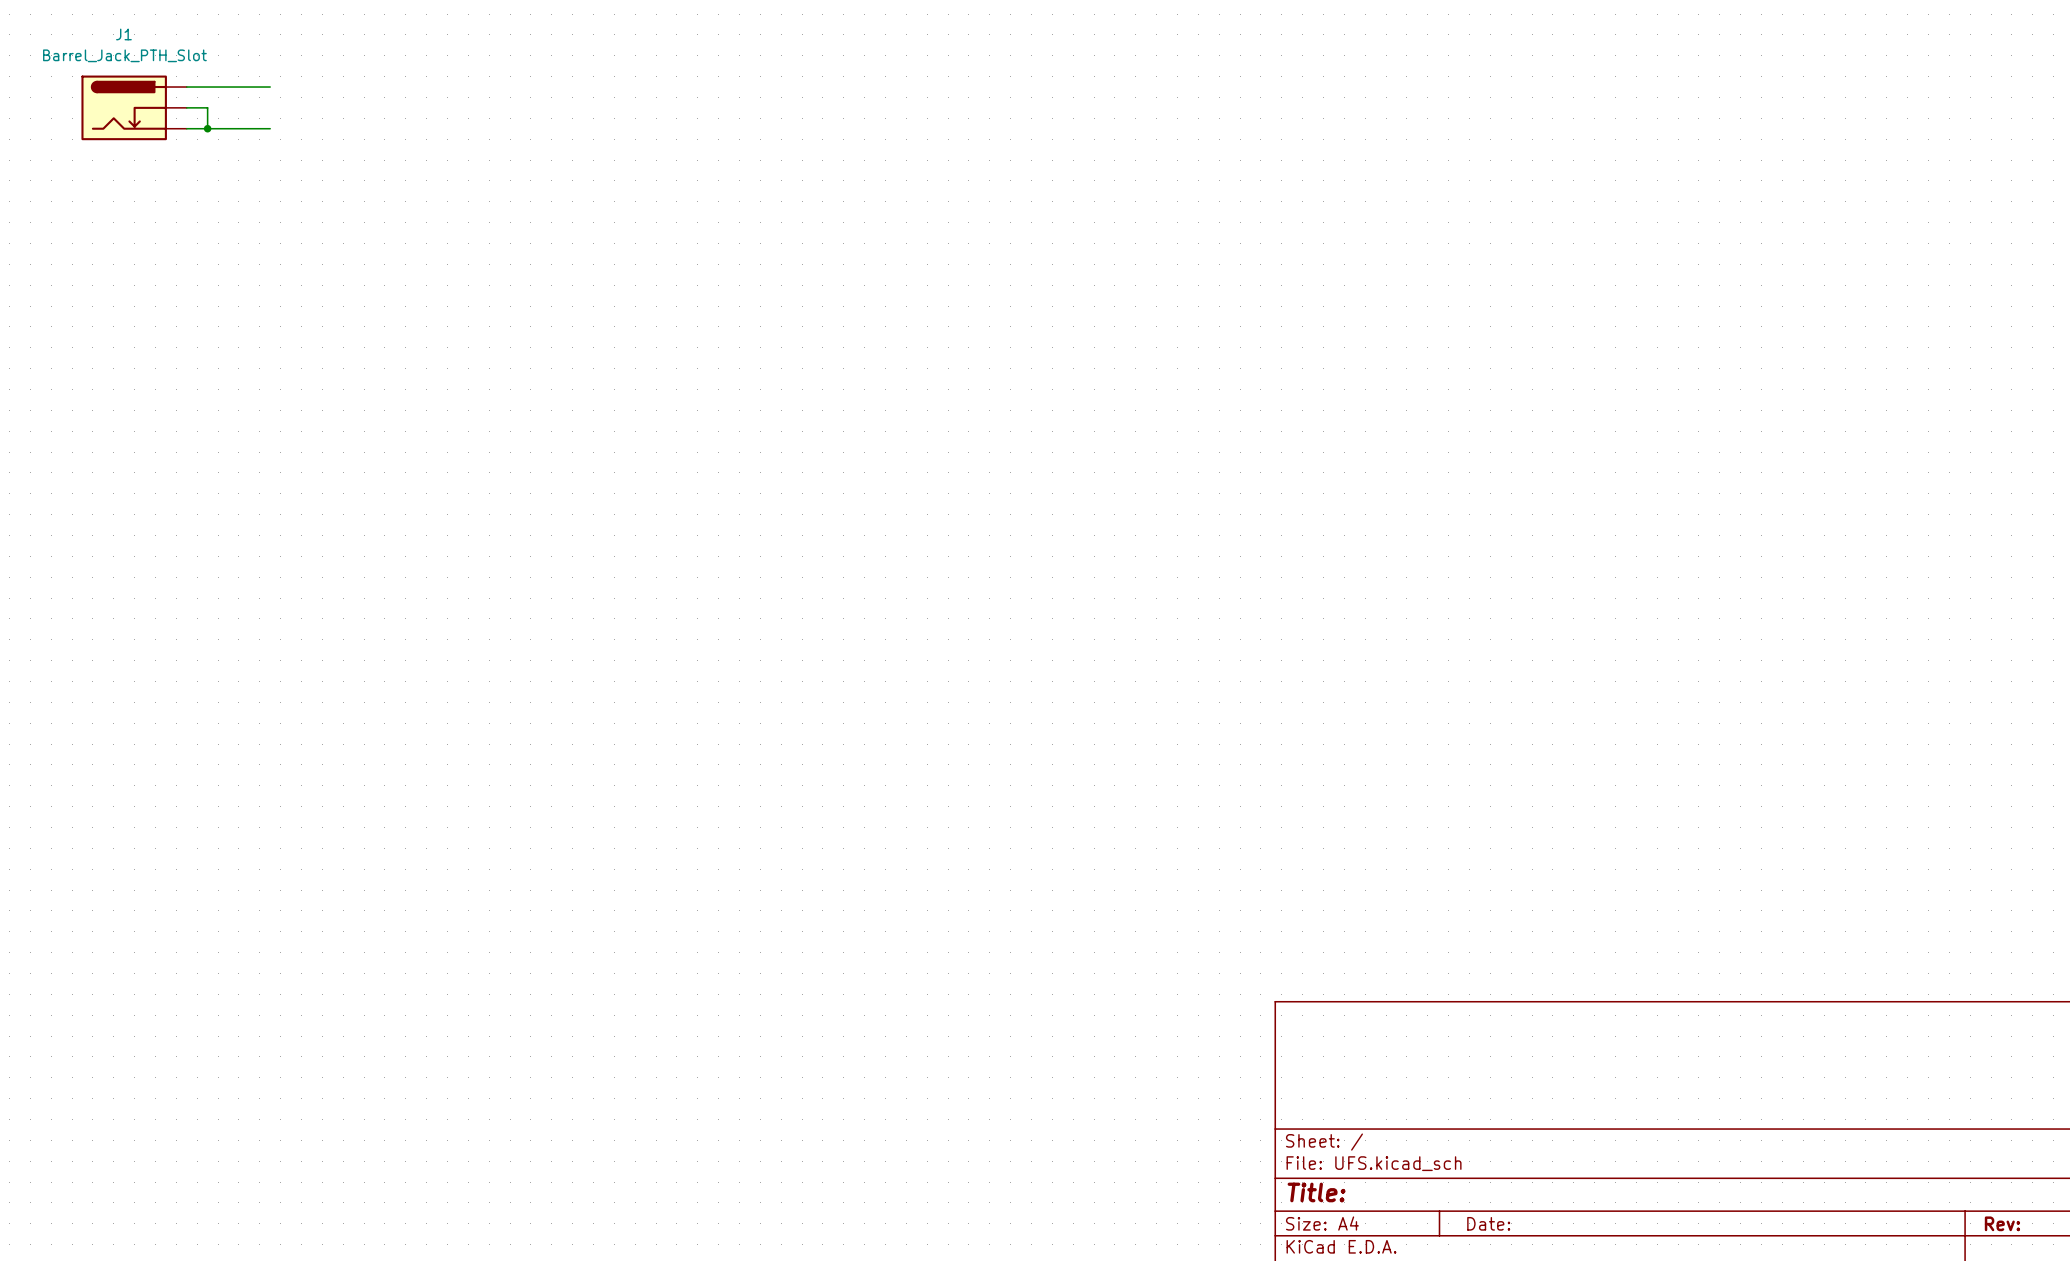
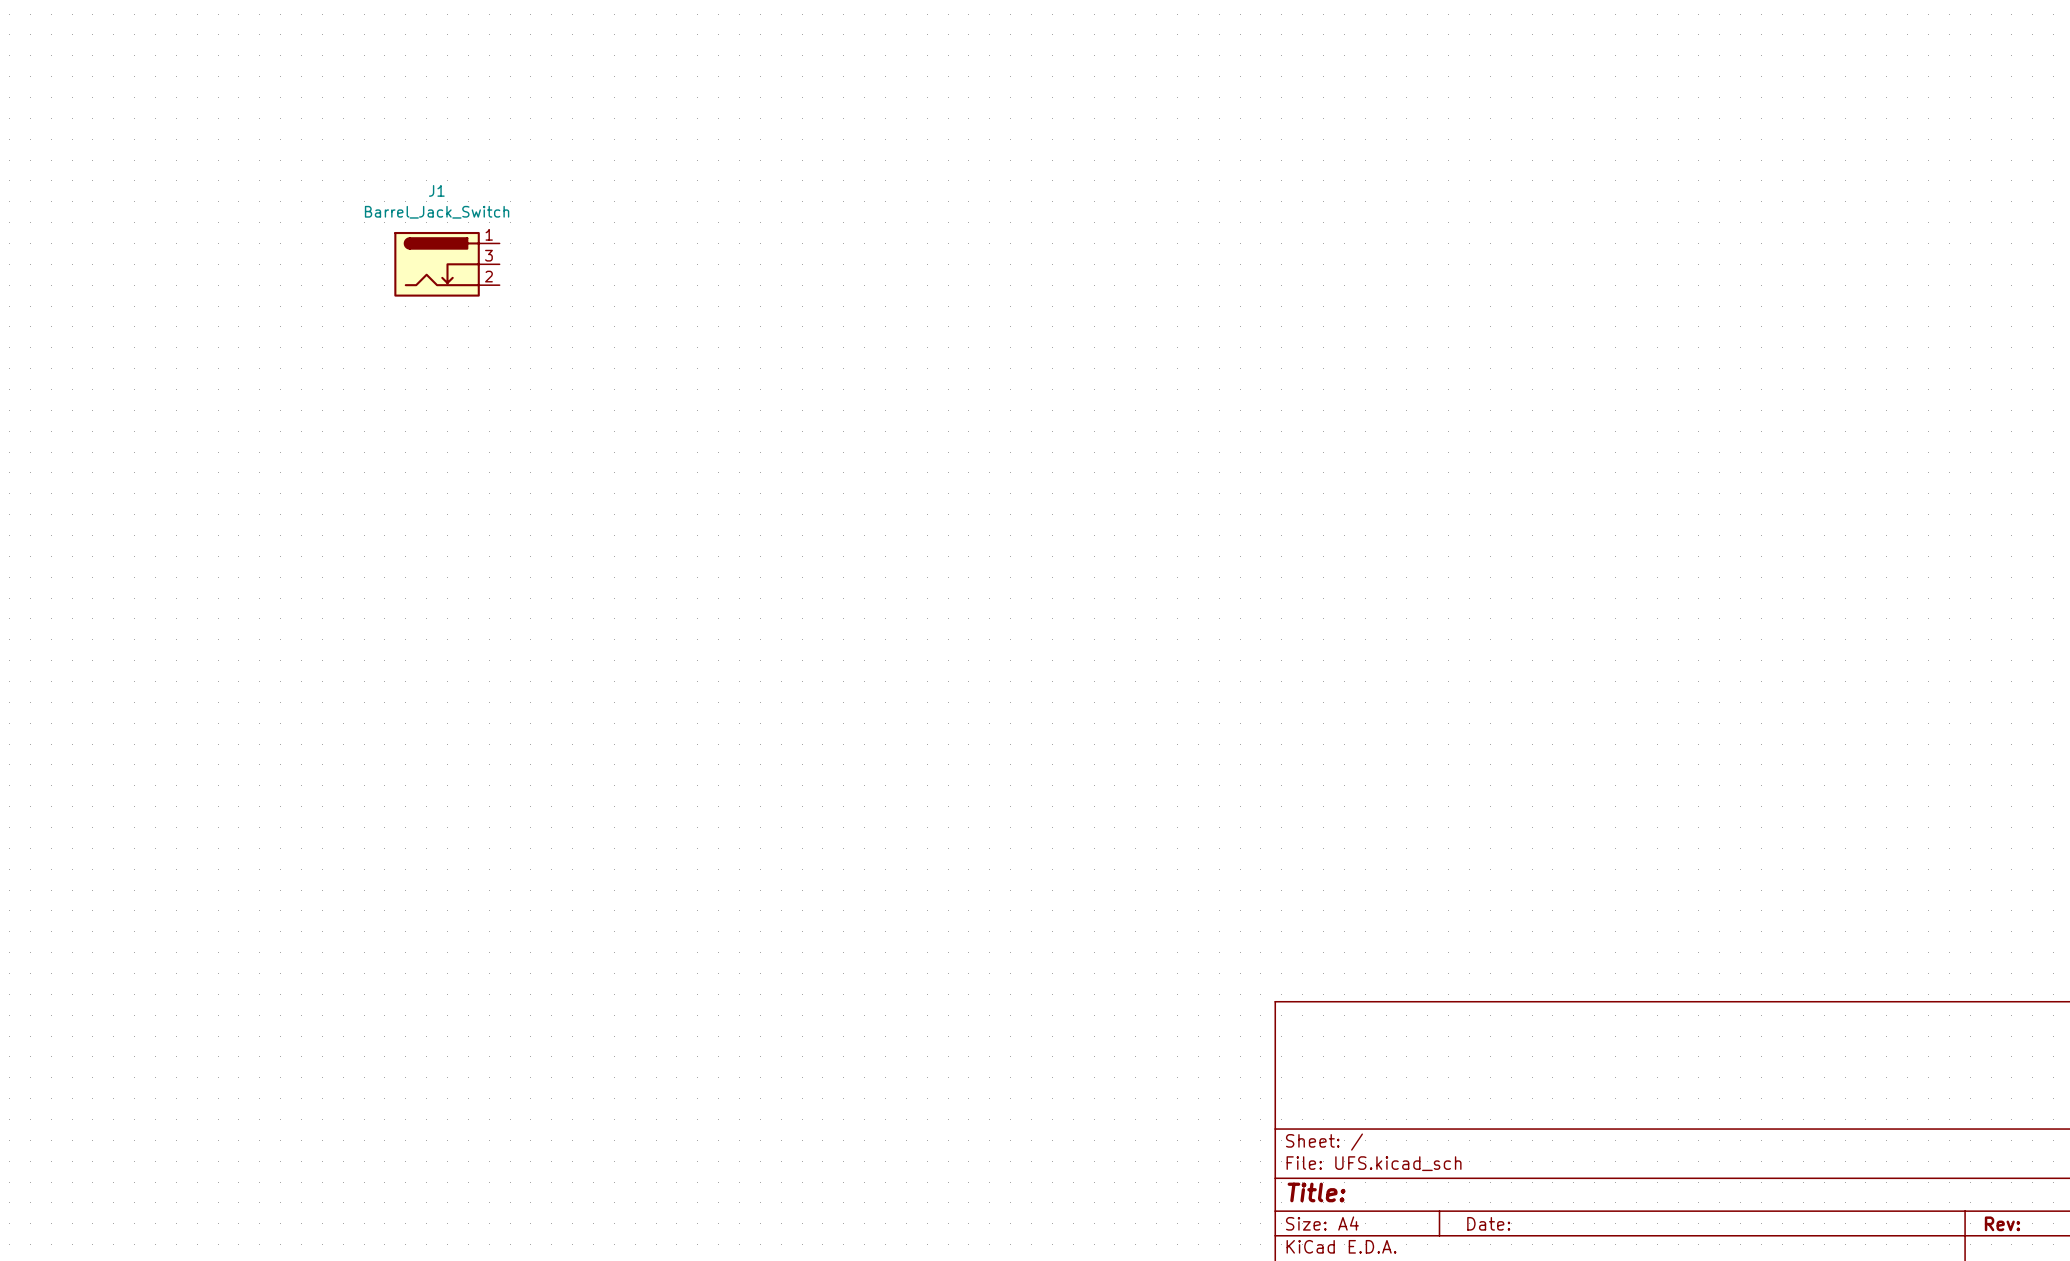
J1 value: Barrel_Jack_PTH_Slot (124, 55) -> Barrel_Jack_Switch (437, 212)
wire: (186, 87) (270, 87) -> none
J1 position: (134, 107) -> (446, 264)
wire: (186, 107) (207, 107) (207, 128) -> none
wire: (186, 128) (270, 128) -> none
junction: (207, 128) -> none
J1 pin number: none -> 1 (489, 234)
J1 pin number: none -> 3 (488, 255)
J1 pin number: none -> 2 (488, 276)

